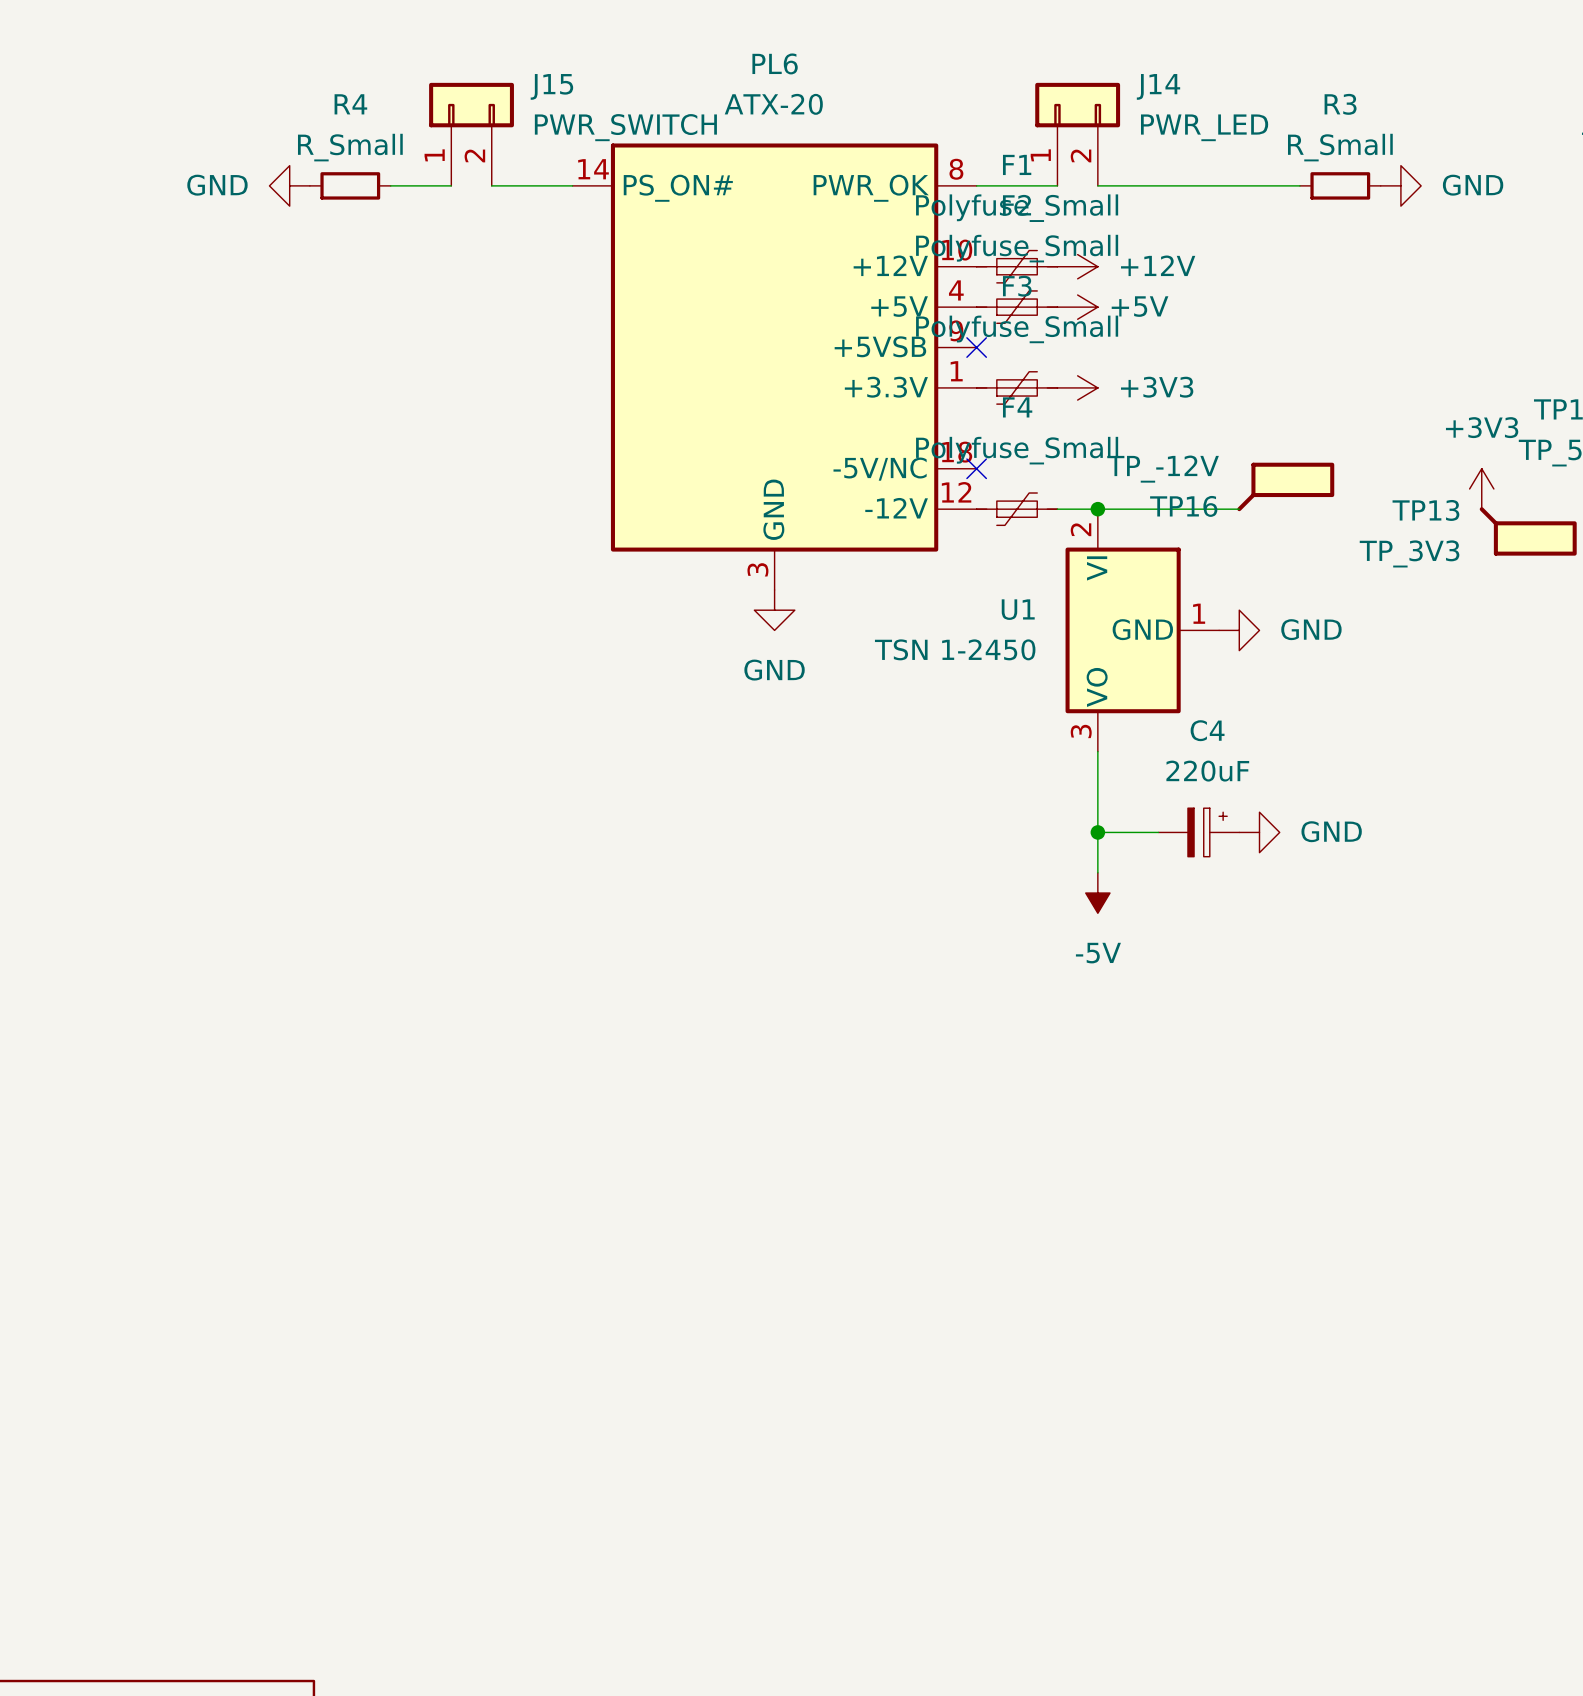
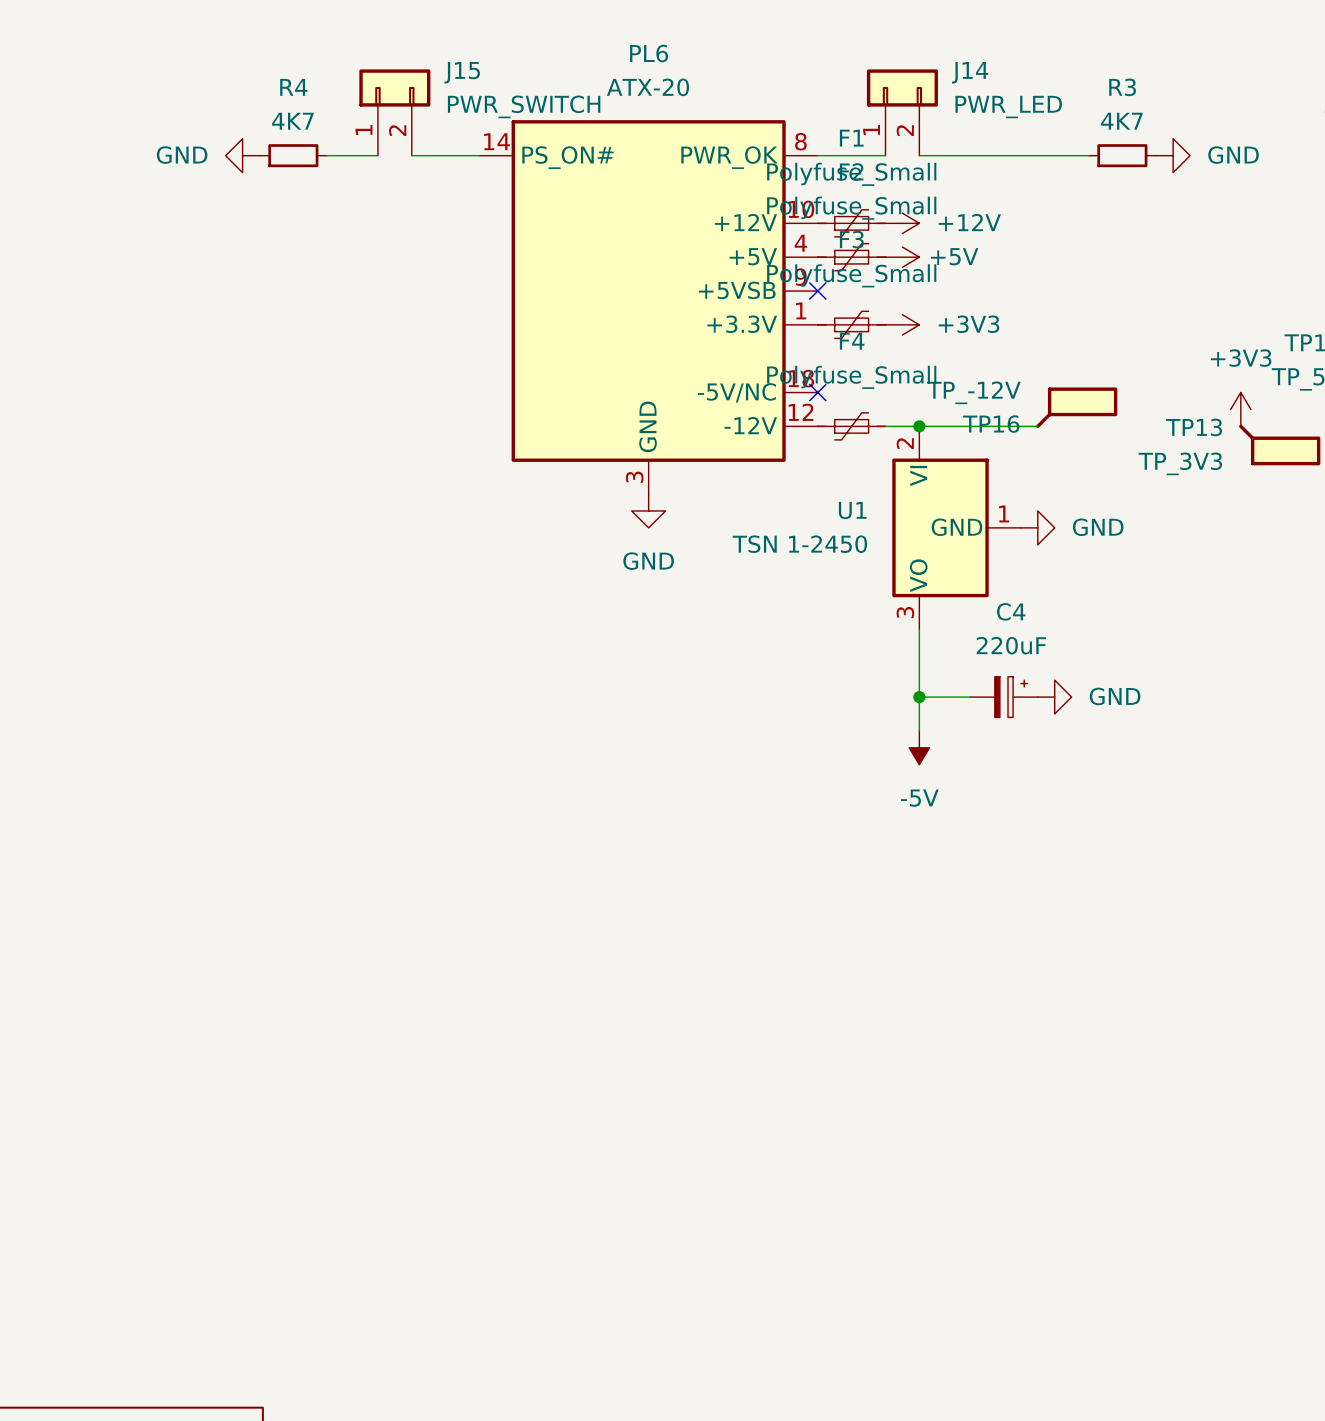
R4 value: R_Small (350, 147) -> 4K7 (292, 121)
R3 value: R_Small (1340, 147) -> 4K7 (1121, 121)

